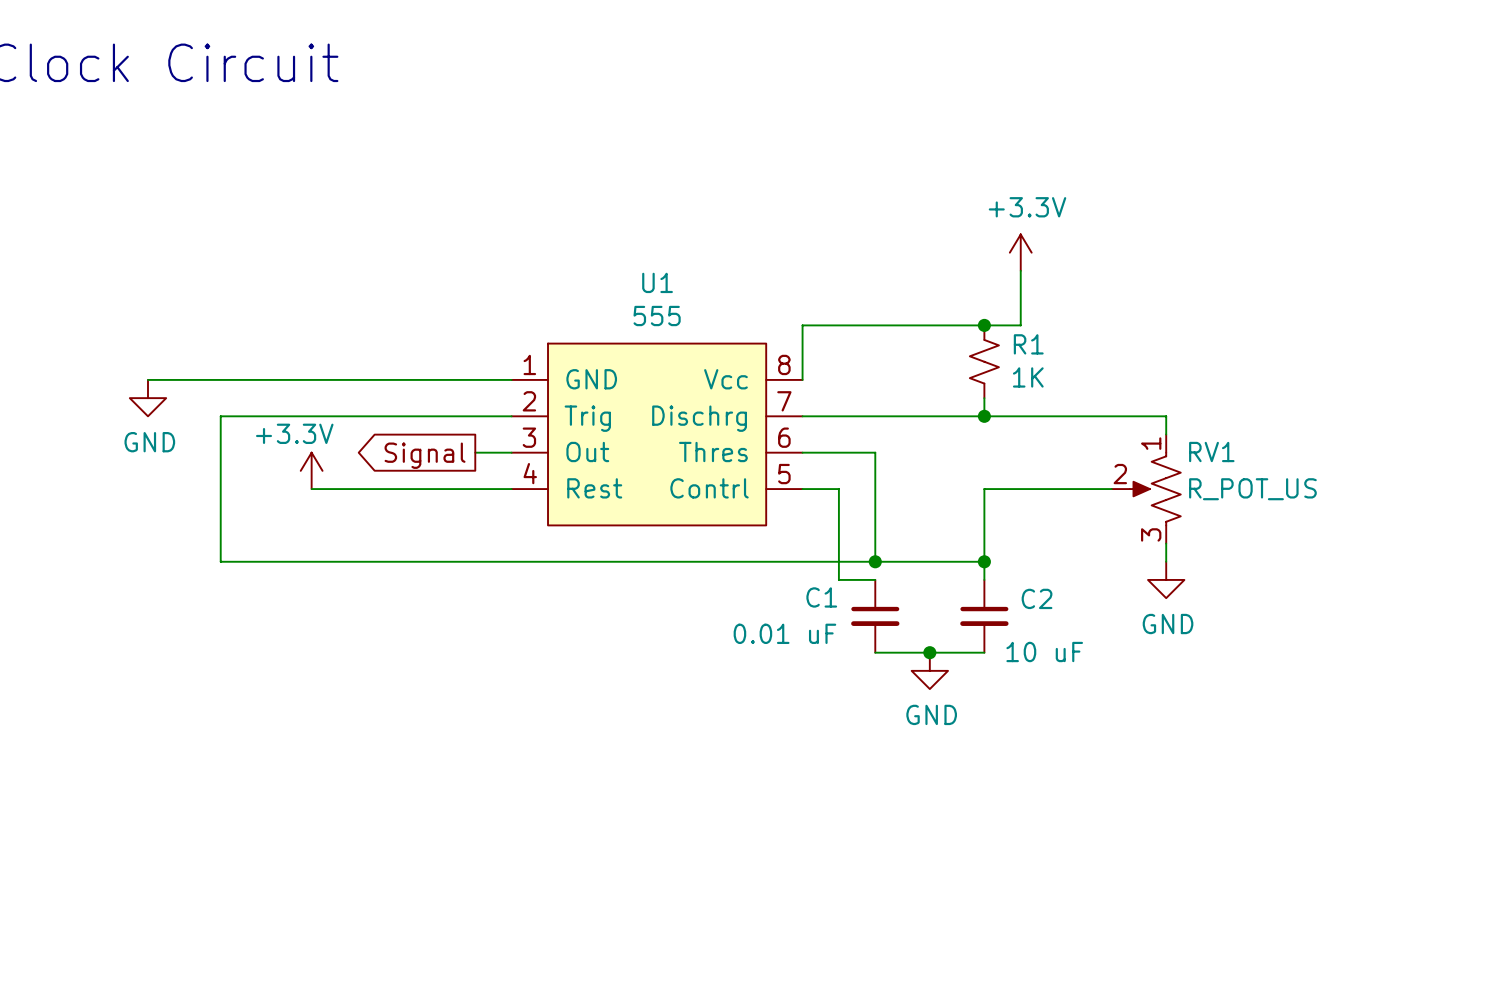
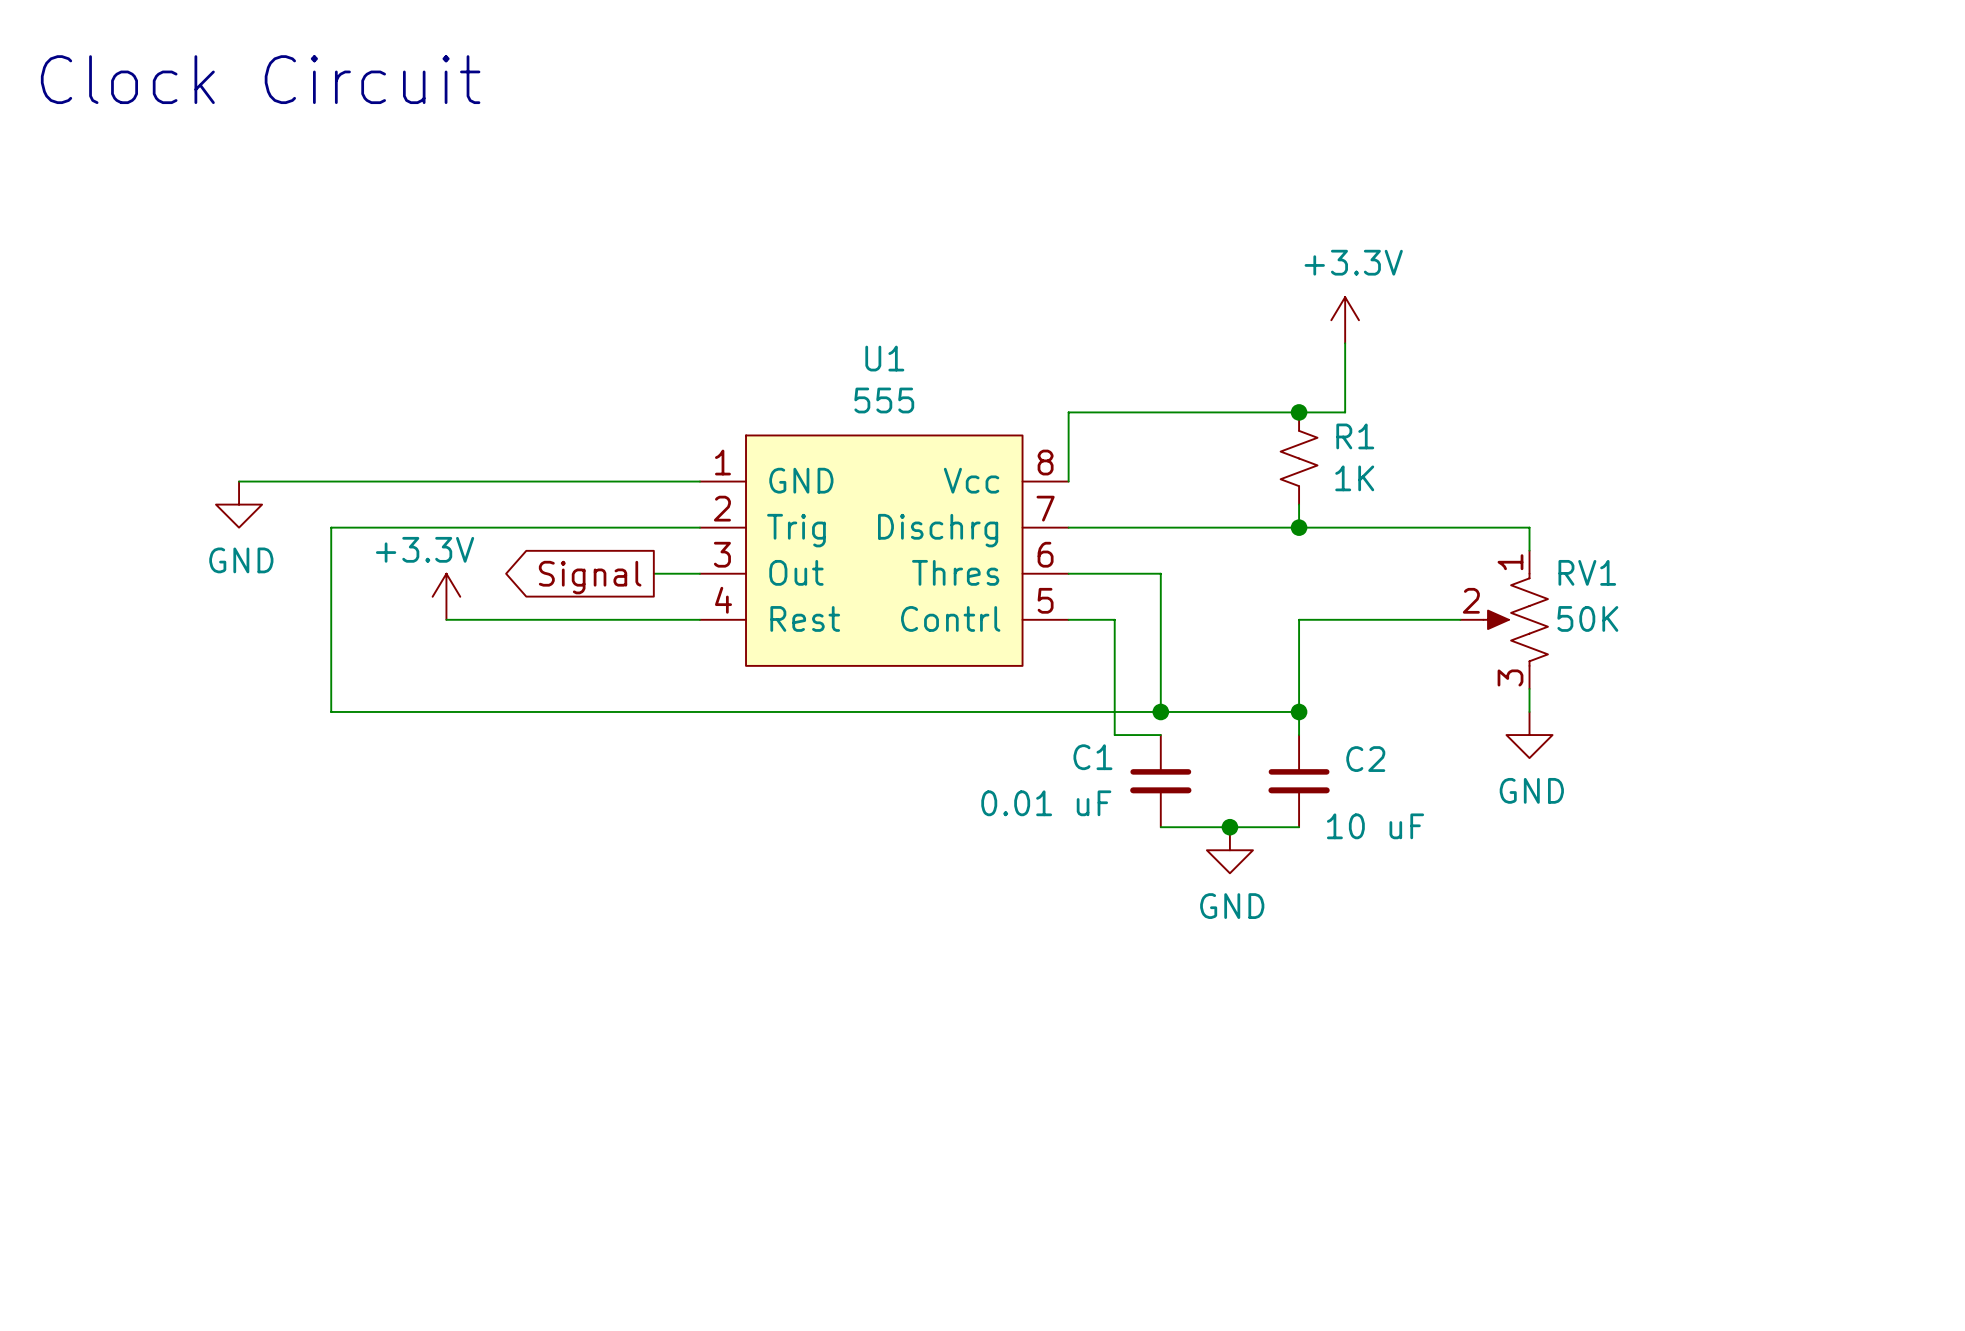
RV1 value: R_POT_US (1252, 489) -> 50K (1587, 618)

